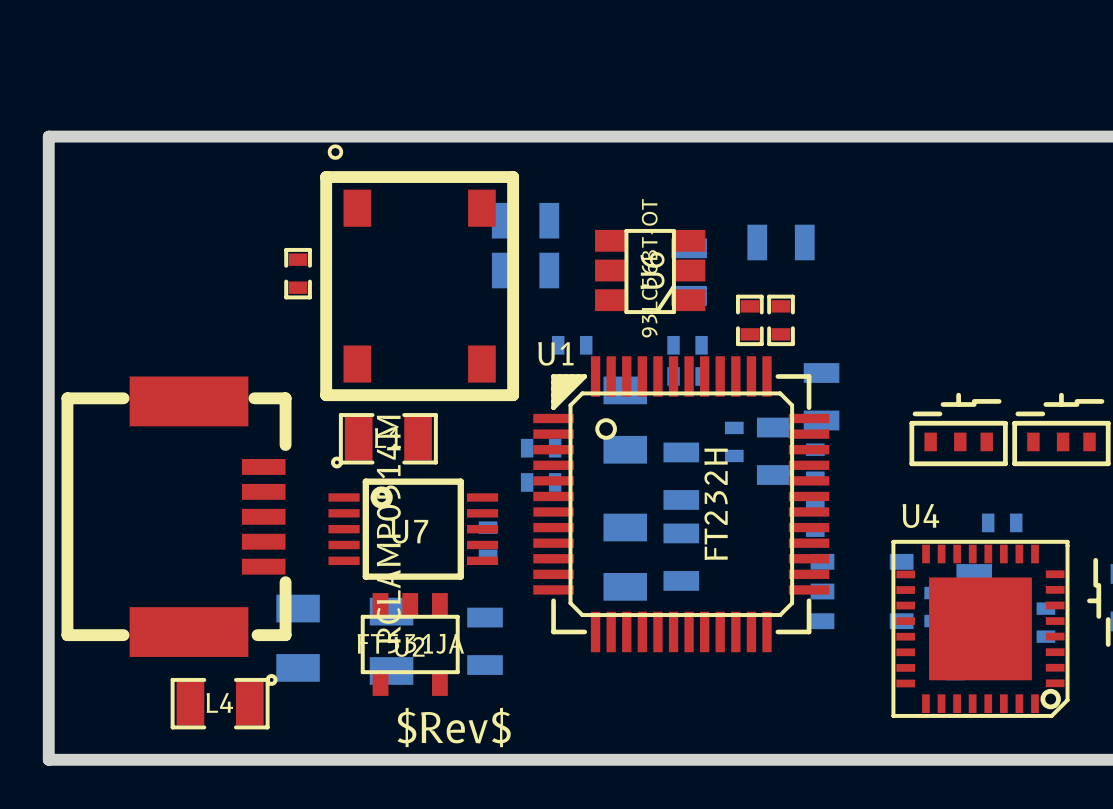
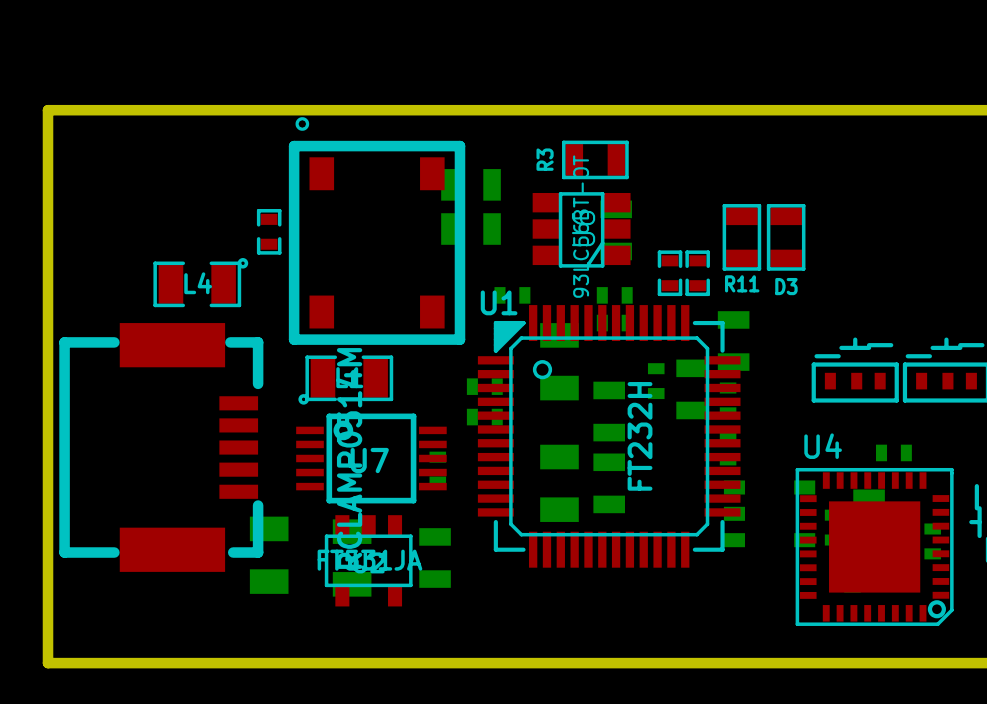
R3 side: bottom (781, 242) -> top (595, 159)
R11: none -> (741, 237)
D3: none -> (786, 237)
L4 position: (224, 701) -> (200, 282)
text: $Rev$ (454, 727) -> none

